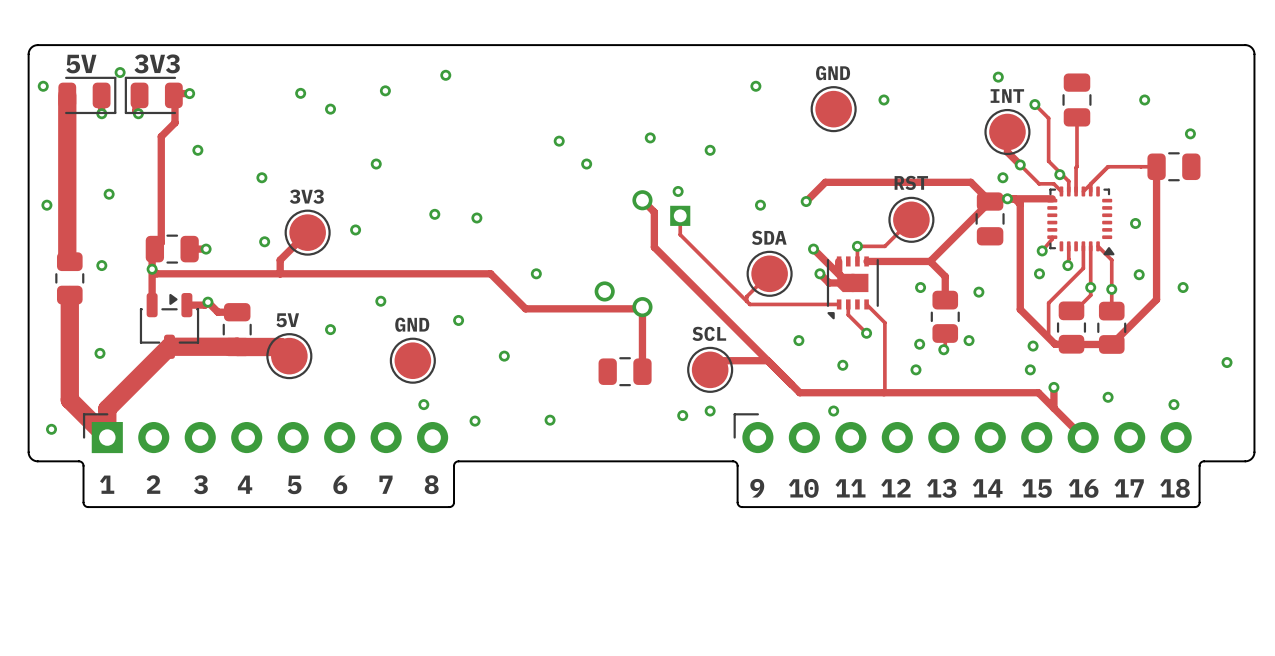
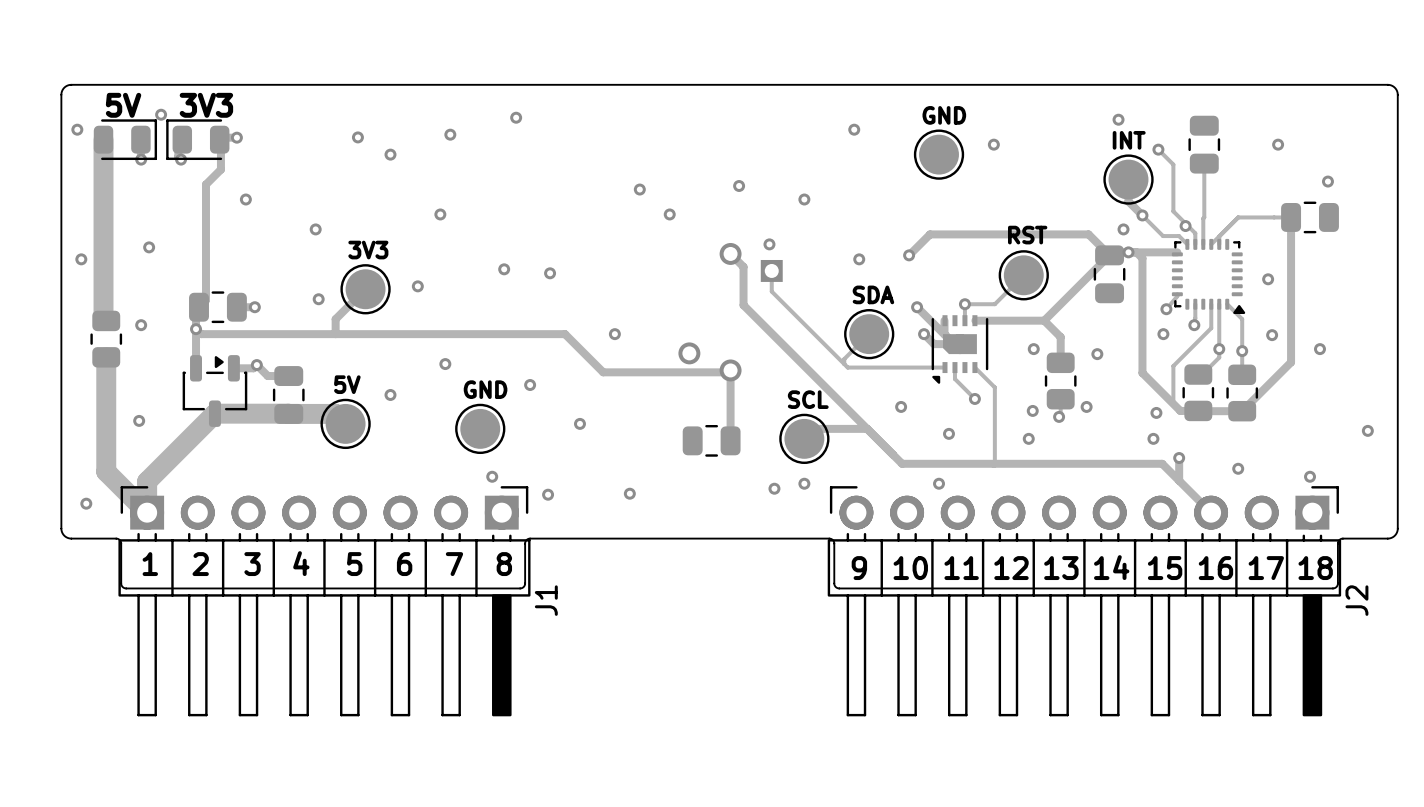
J1: none -> (324, 601)
J2: none -> (1084, 601)

